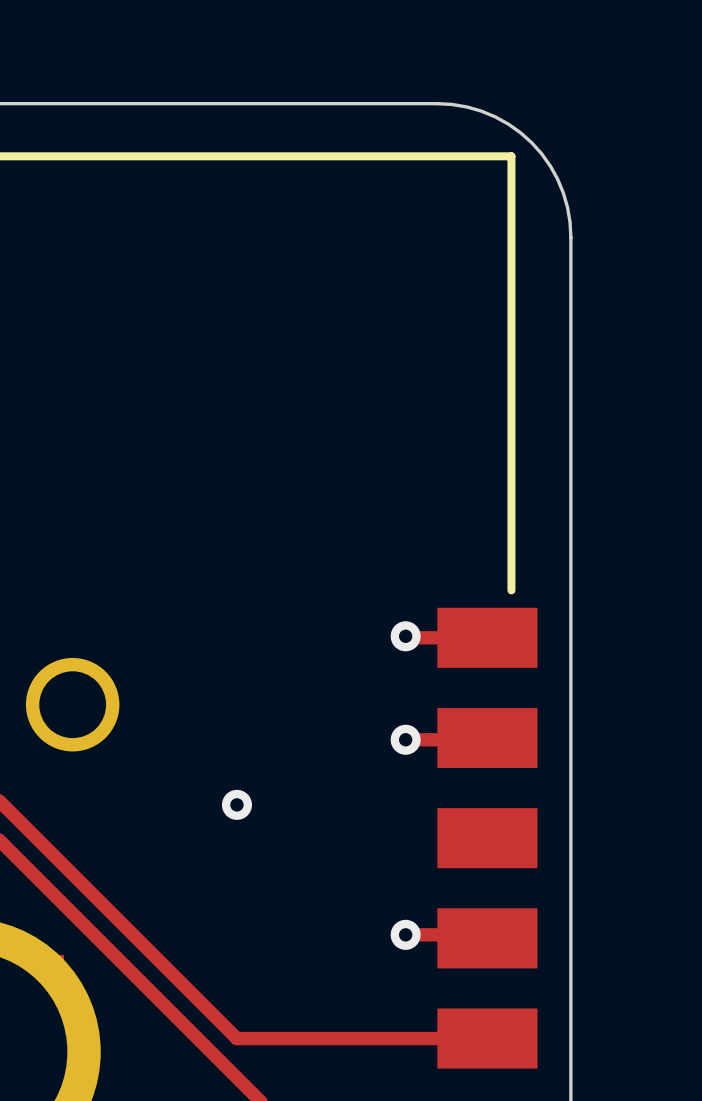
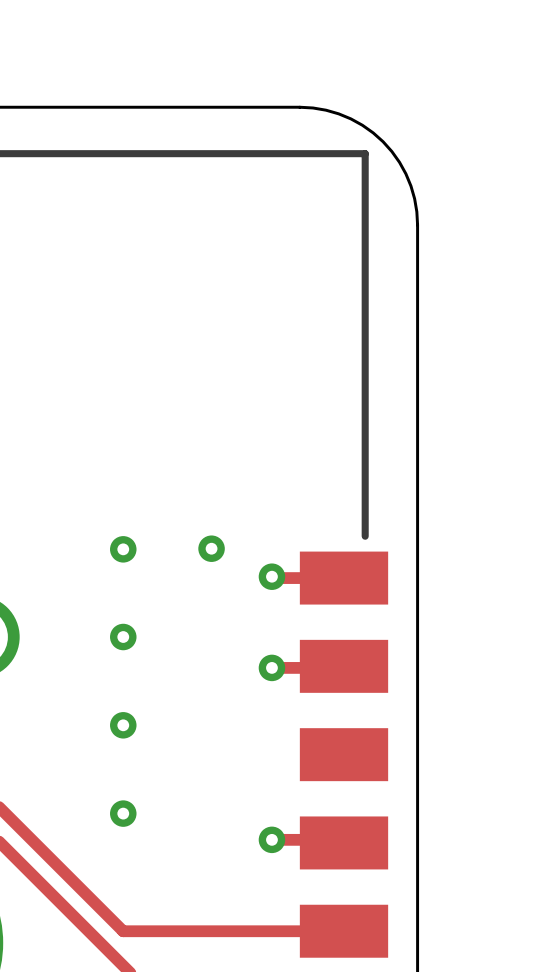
via: none -> (211, 548)
via: none -> (123, 549)
via: none -> (123, 637)
via: none -> (123, 813)

